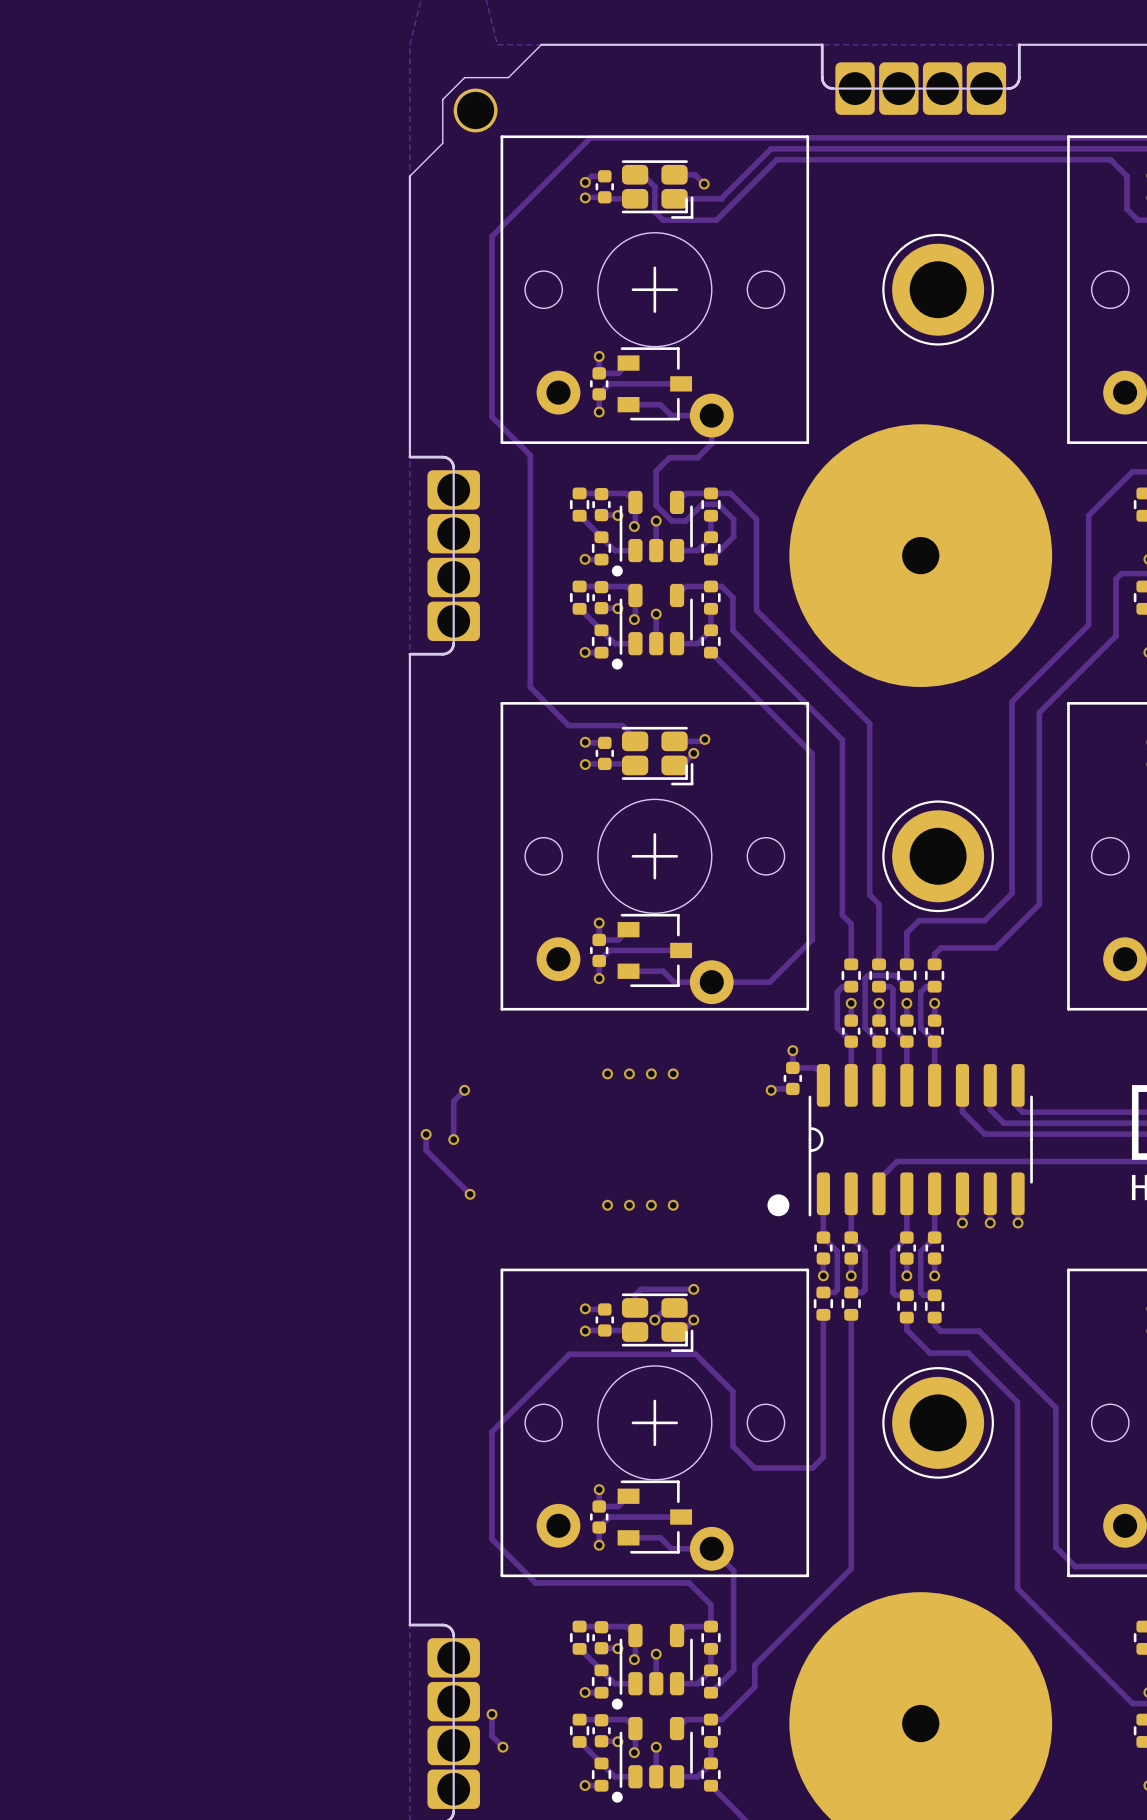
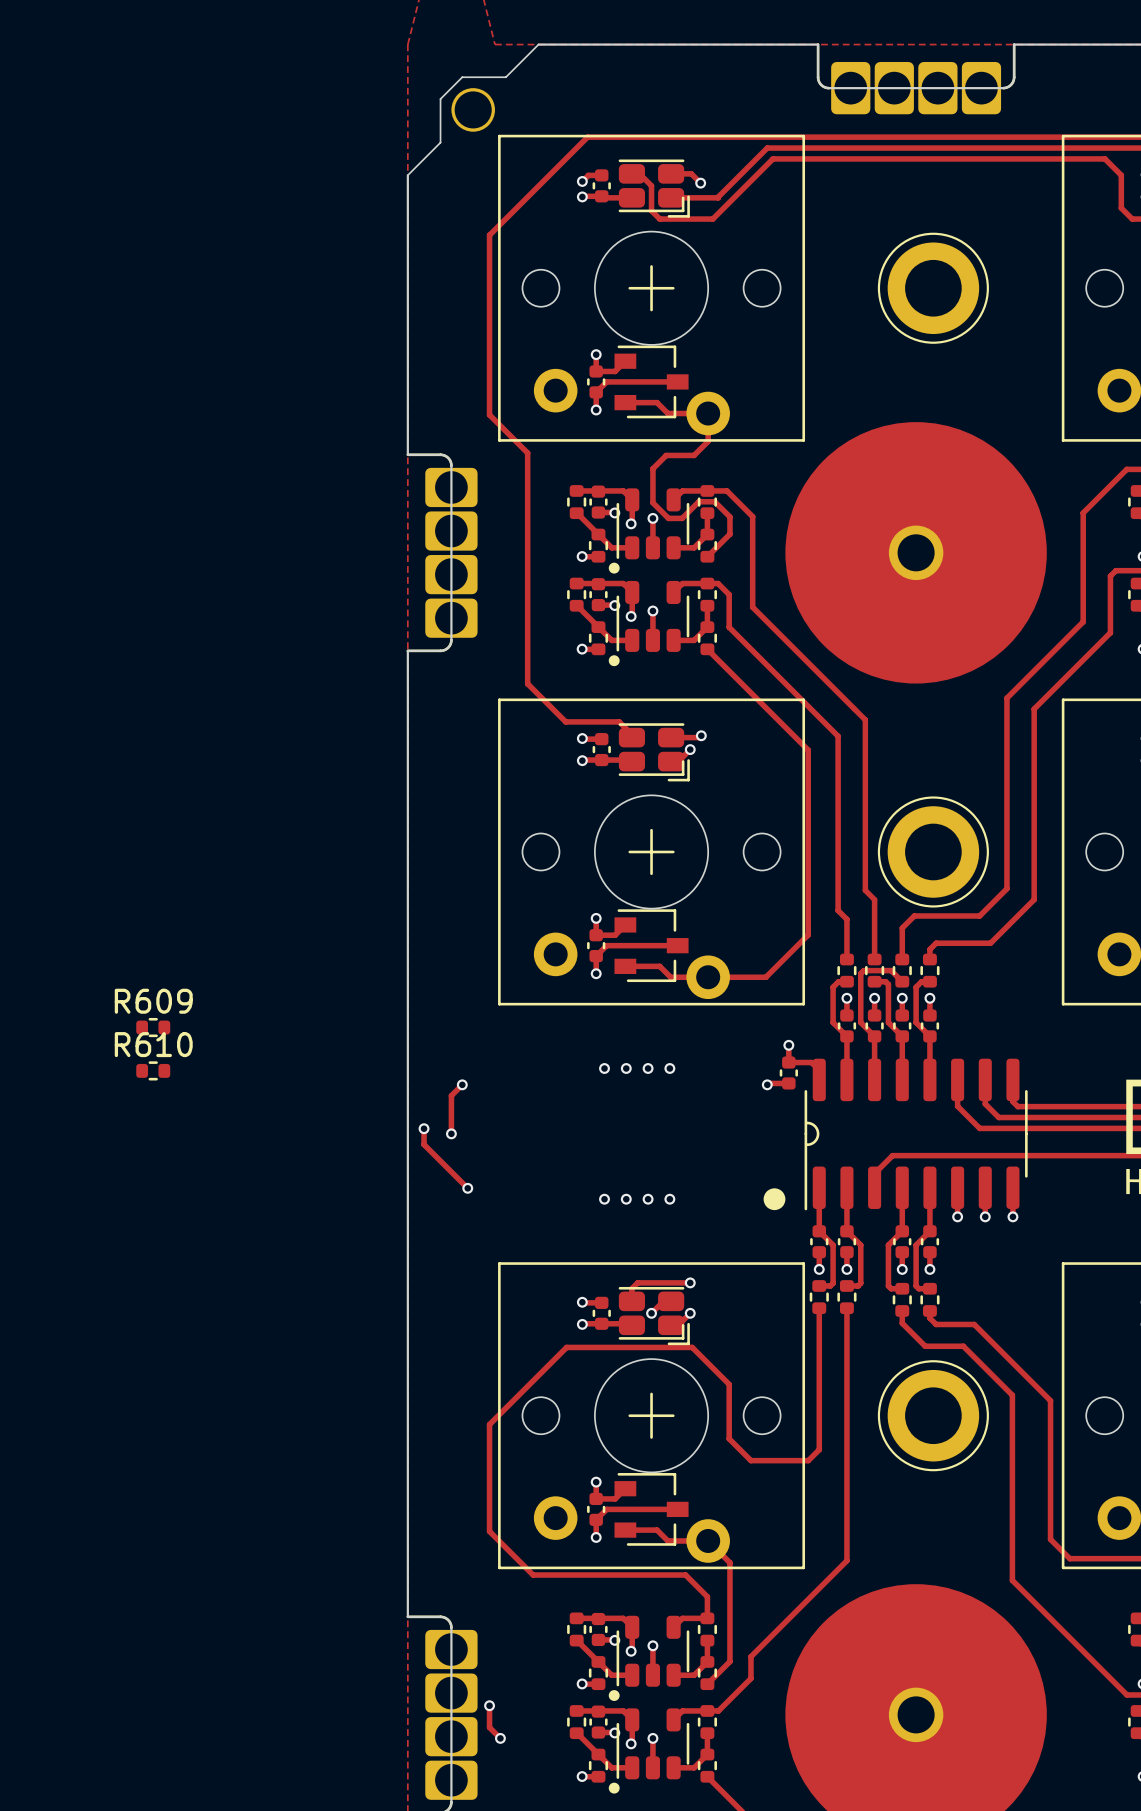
R609: none -> (153, 1027)
R610: none -> (153, 1070)

